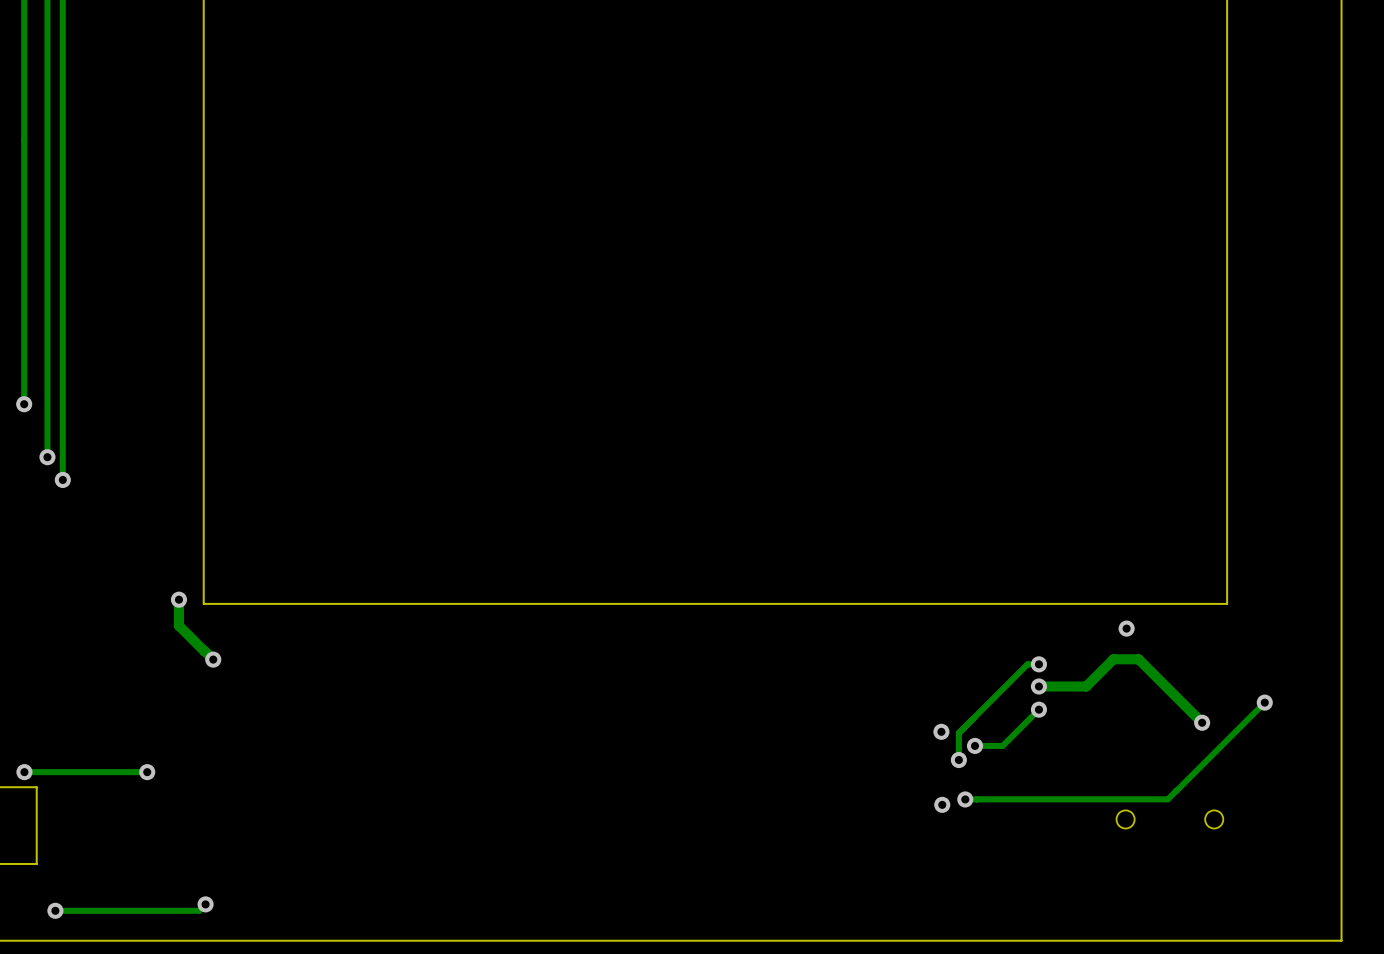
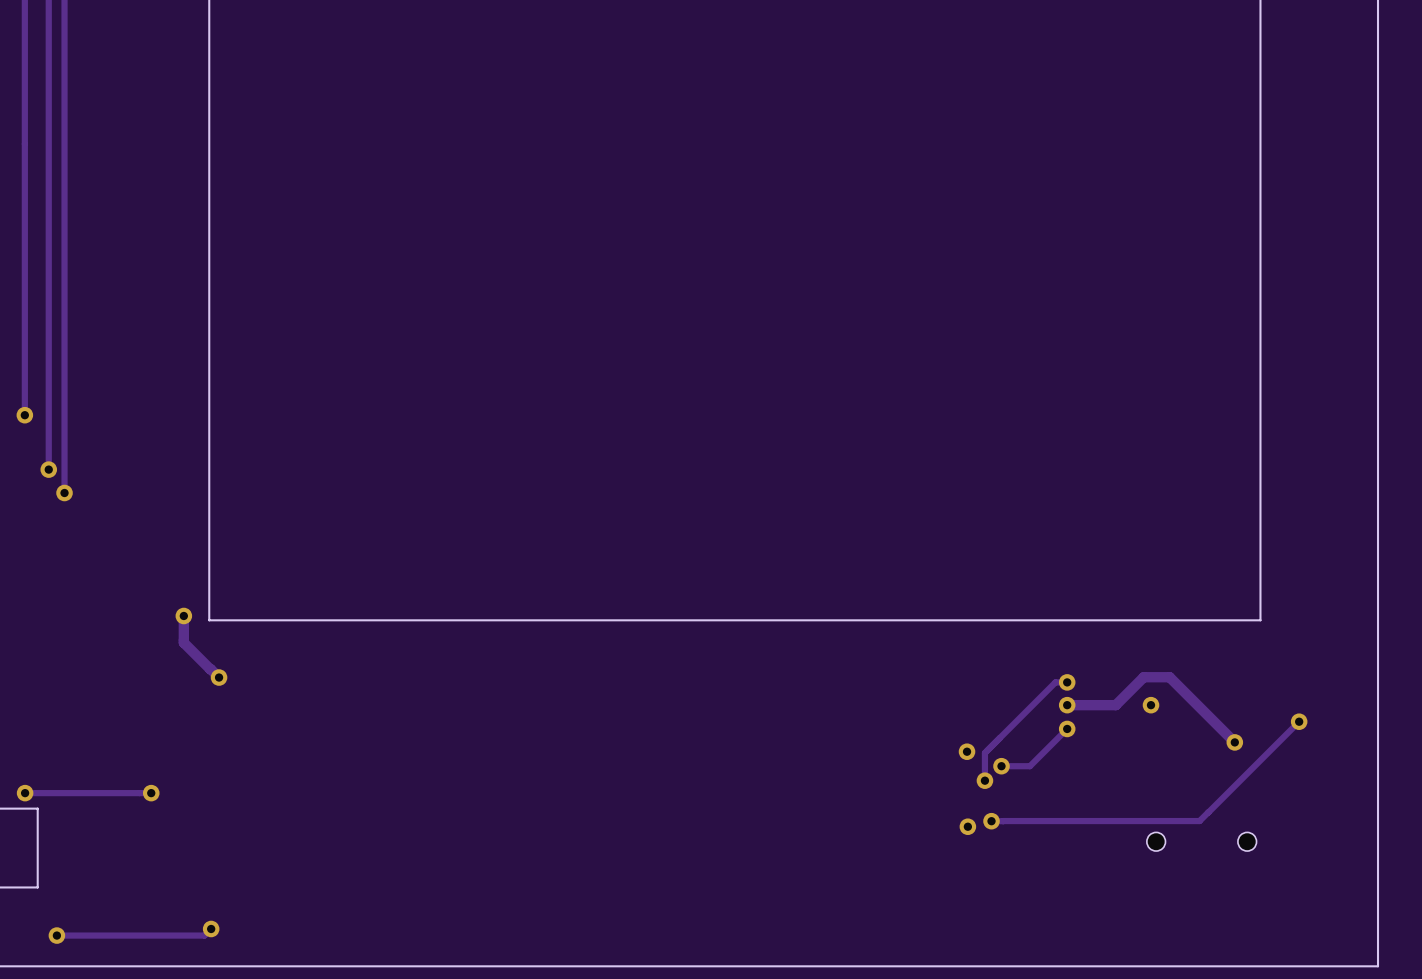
via position: (1126, 628) -> (1151, 705)

